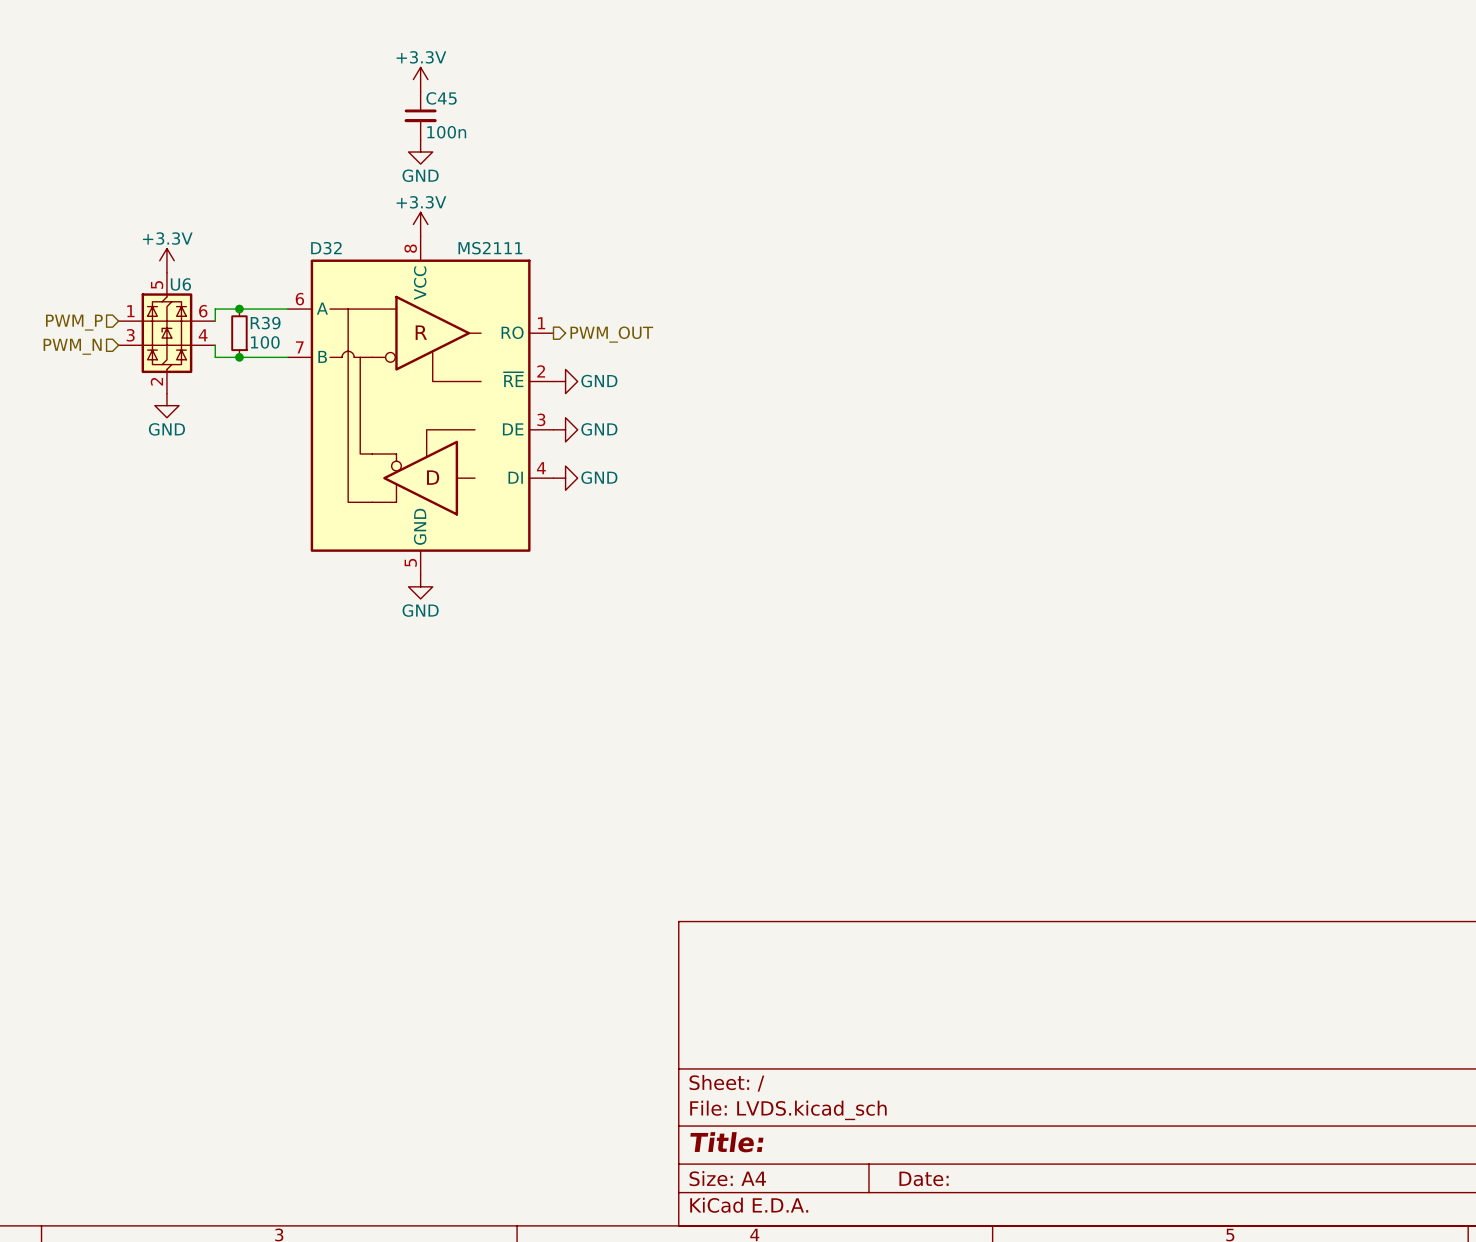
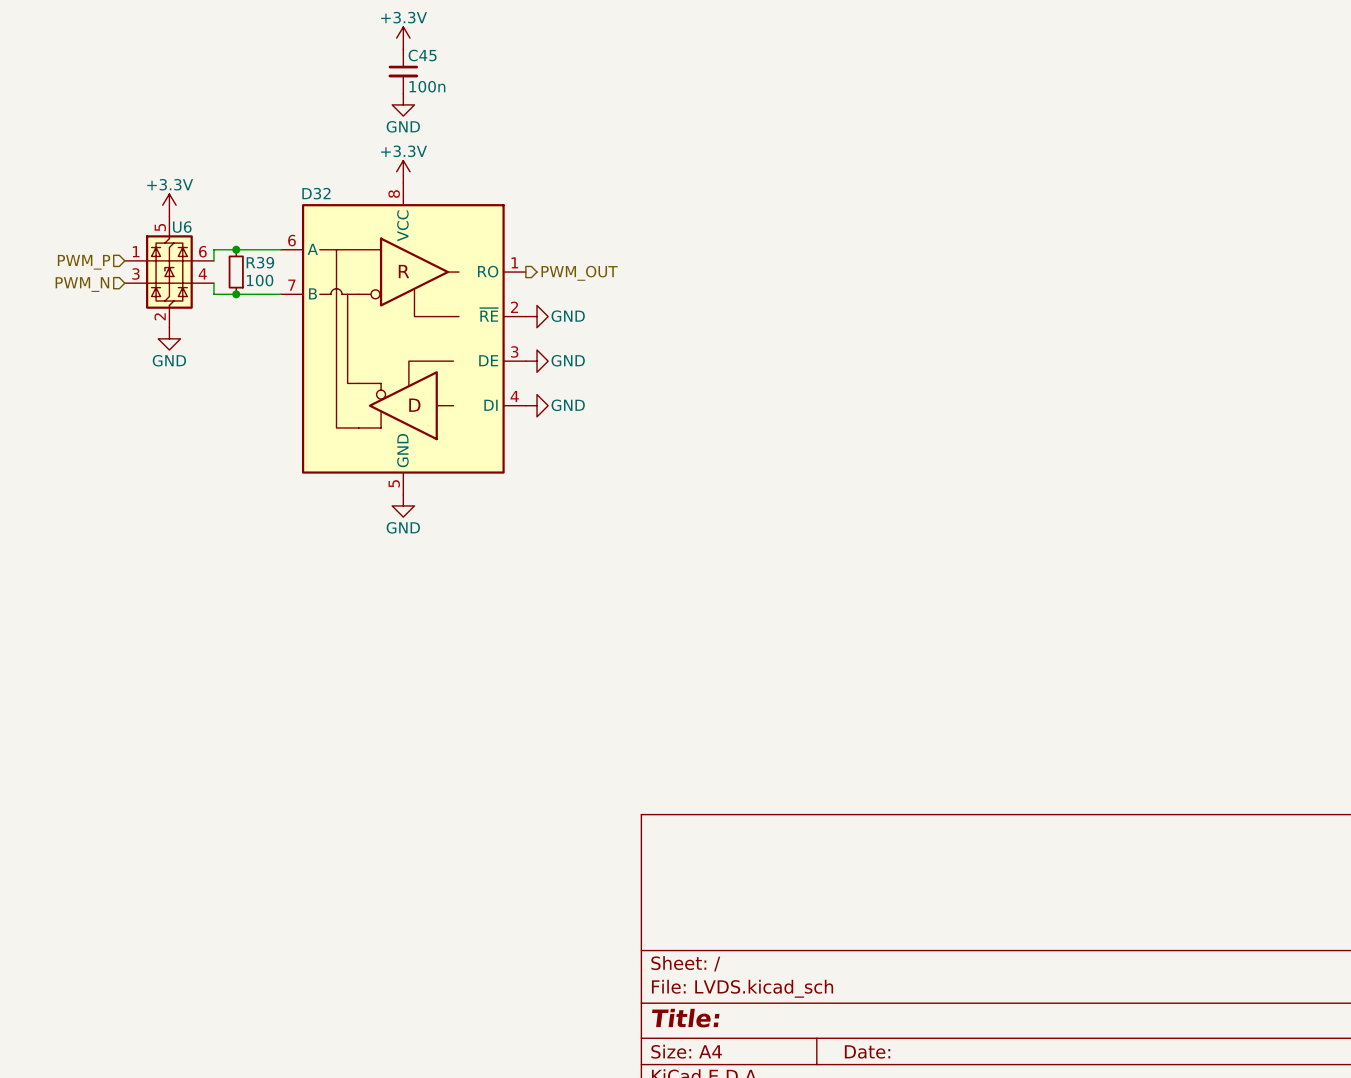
D32 value: MS2111 (490, 248) -> none

